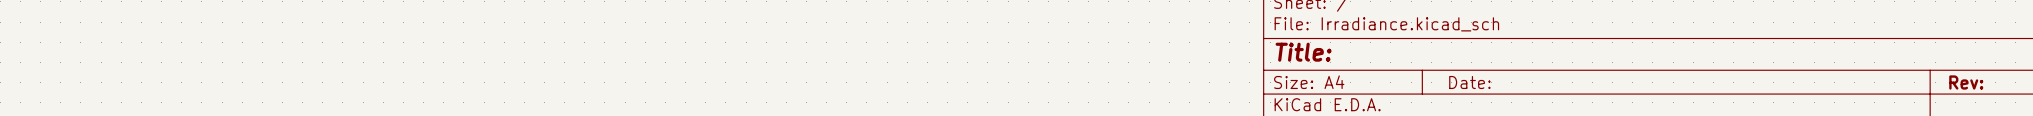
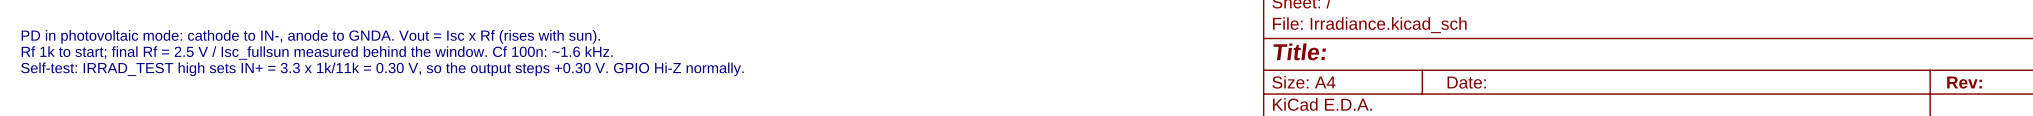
text: none -> PD in photovoltaic mode: cathode to IN-, anode to GNDA. Vout = Isc x Rf (rises with sun). (310, 36)
text: none -> Rf 1k to start; final Rf = 2.5 V / Isc_fullsun measured behind the window. Cf 100n: ~1.6 kHz. (317, 53)
text: none -> Self-test: IRRAD_TEST high sets IN+ = 3.3 x 1k/11k = 0.30 V, so the output steps +0.30 V. GPIO Hi-Z normally. (382, 69)

